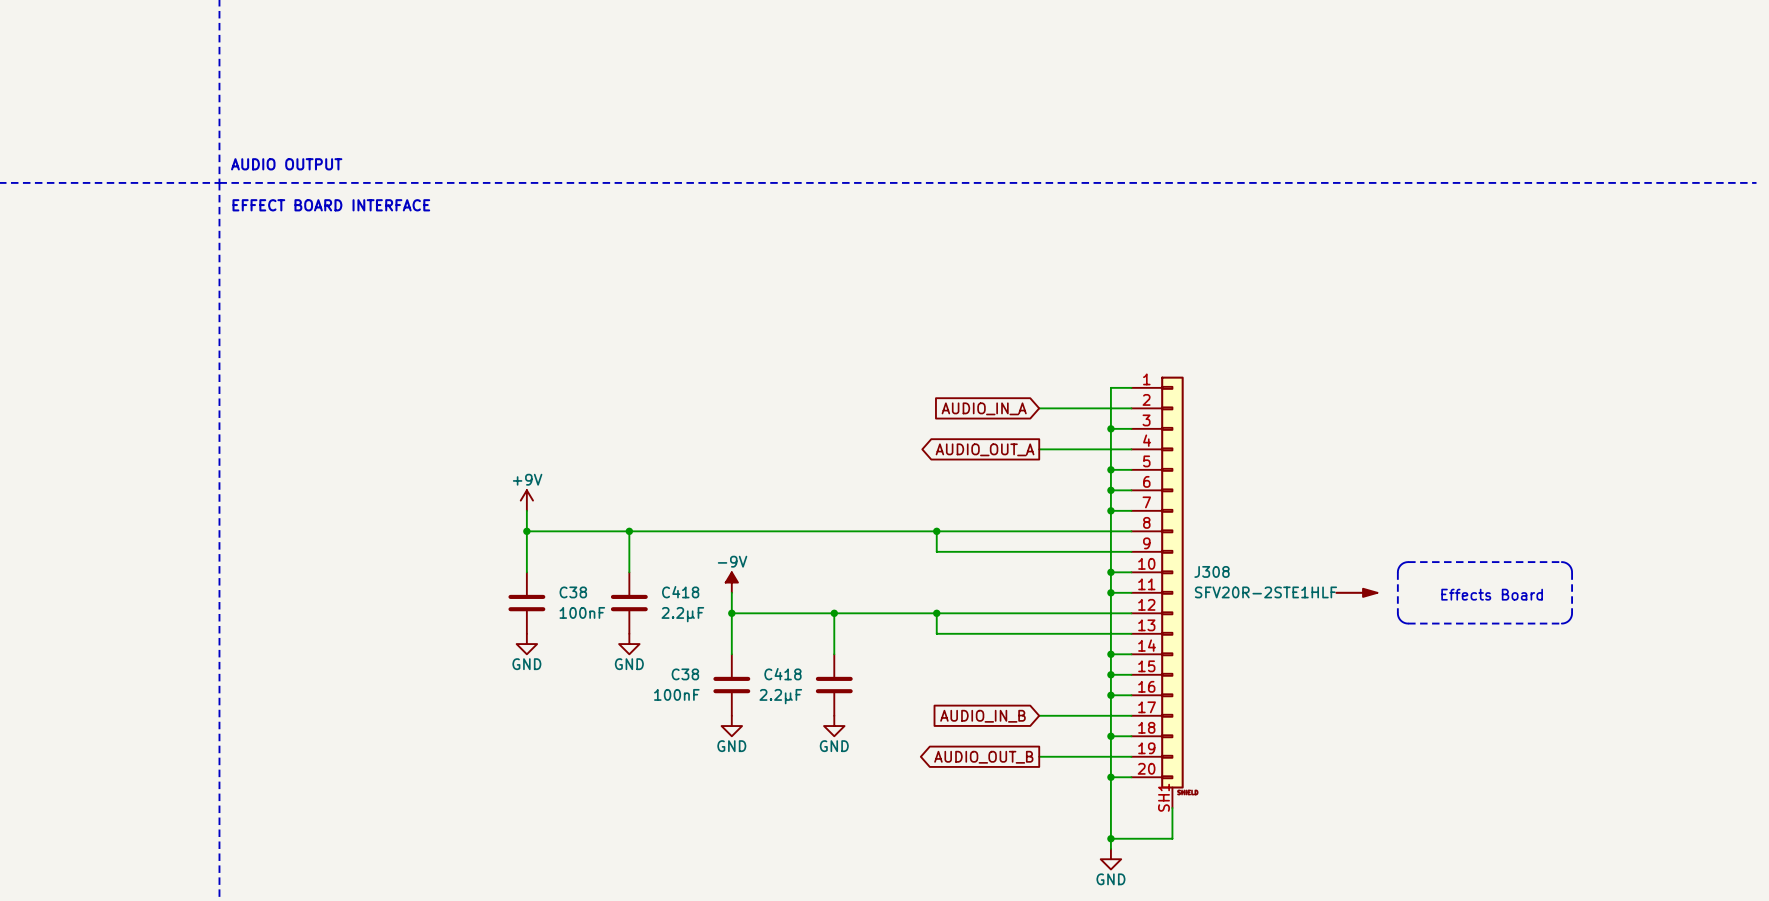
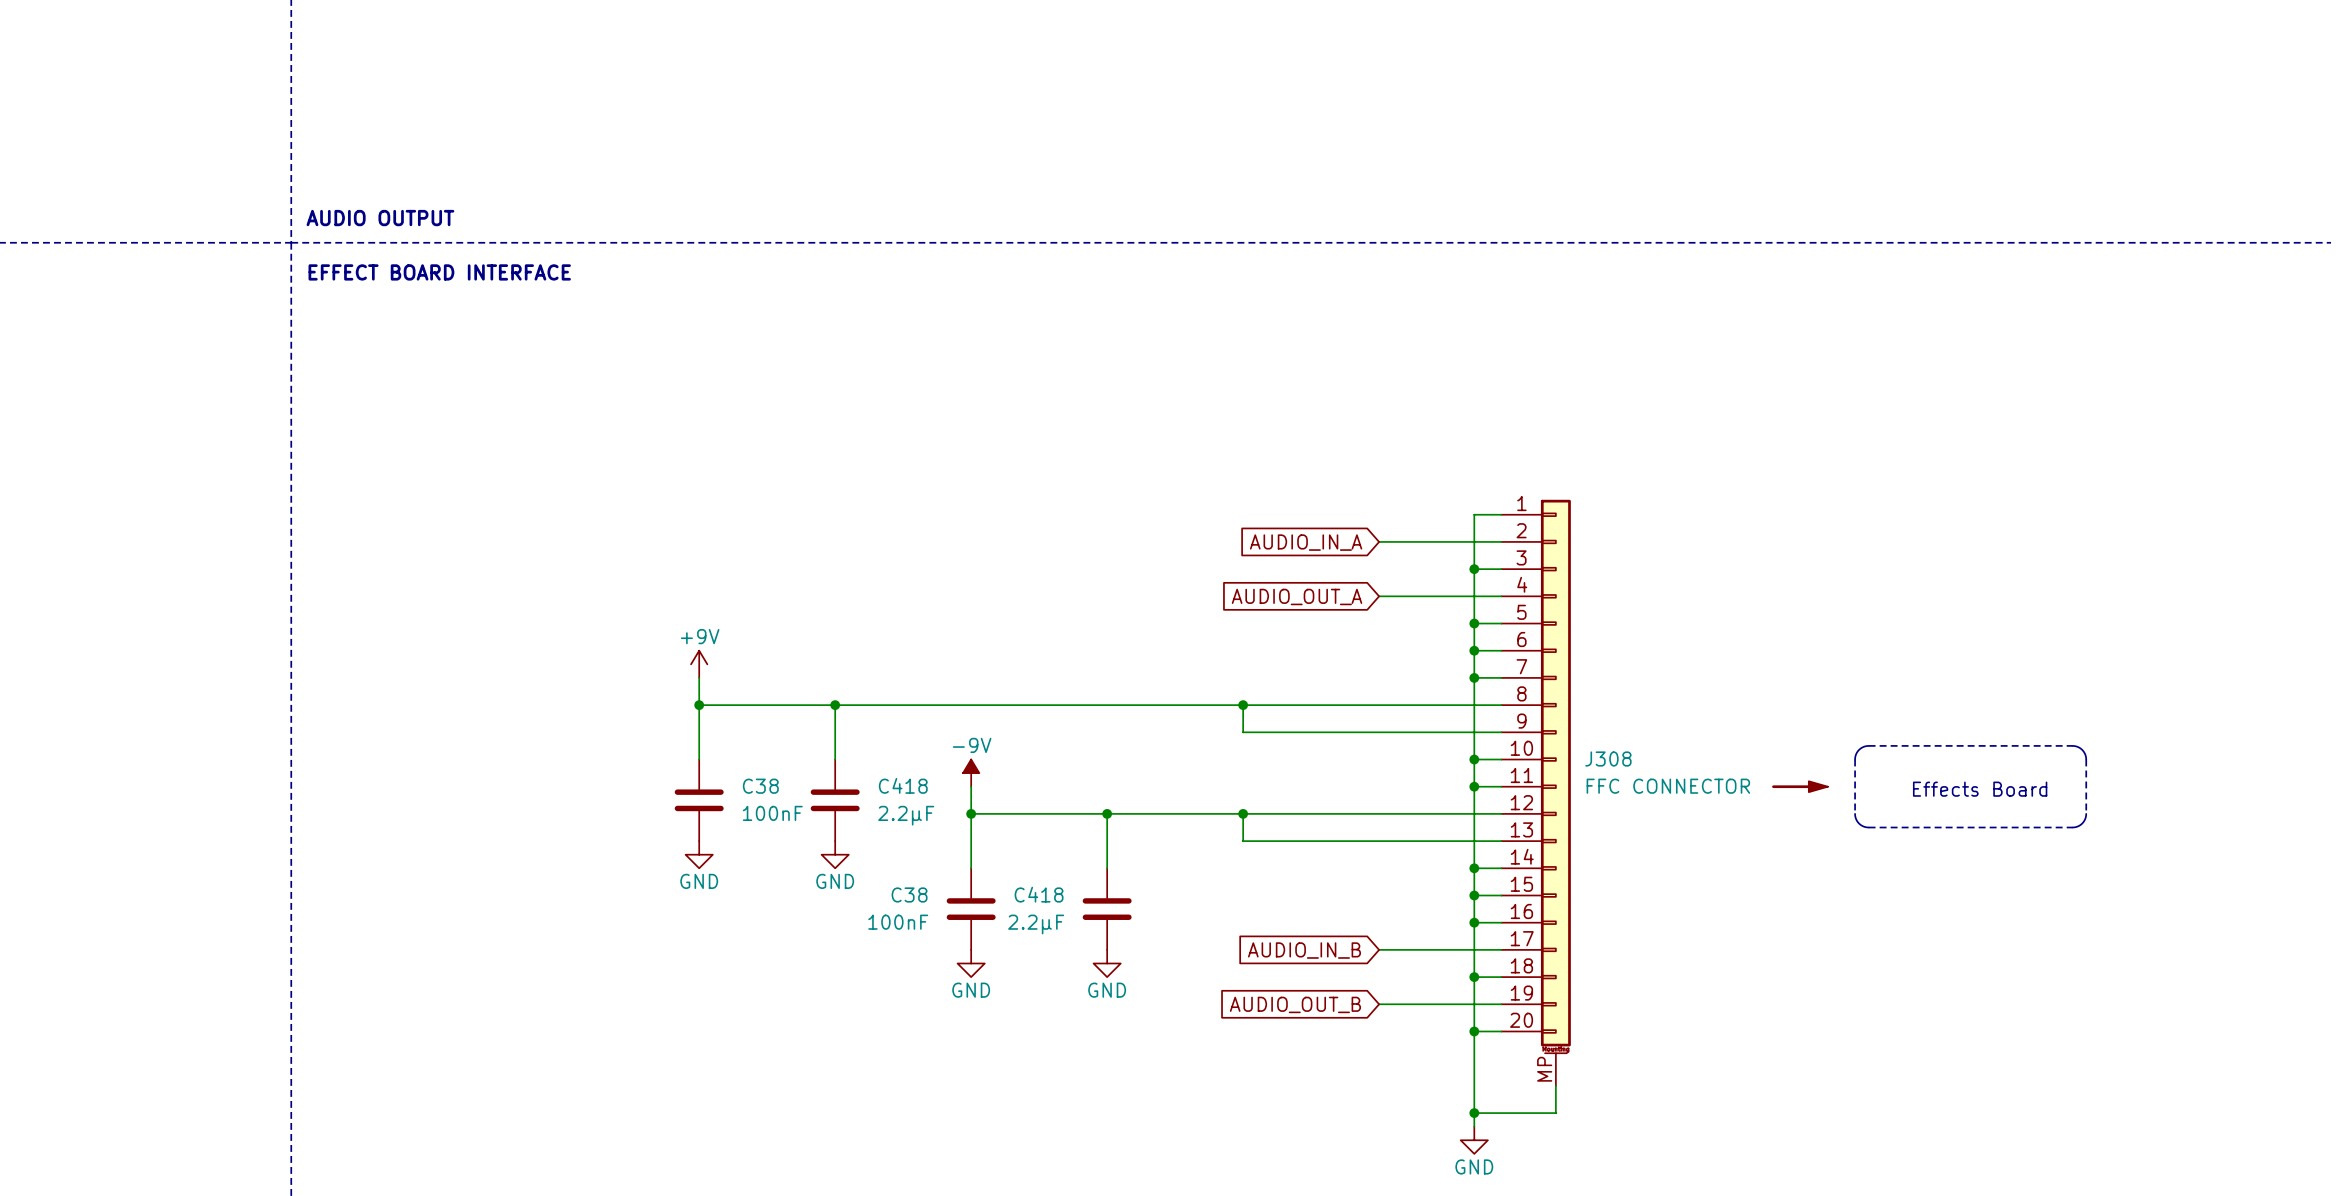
J308 symbol: [1131, 376, 1184, 809] -> [1501, 499, 1571, 1086]
global label shape: output (985, 449) -> input (1297, 596)
J308 value: SFV20R-2STE1HLF (1265, 592) -> FFC CONNECTOR (1668, 786)
global label shape: output (983, 757) -> input (1295, 1004)

